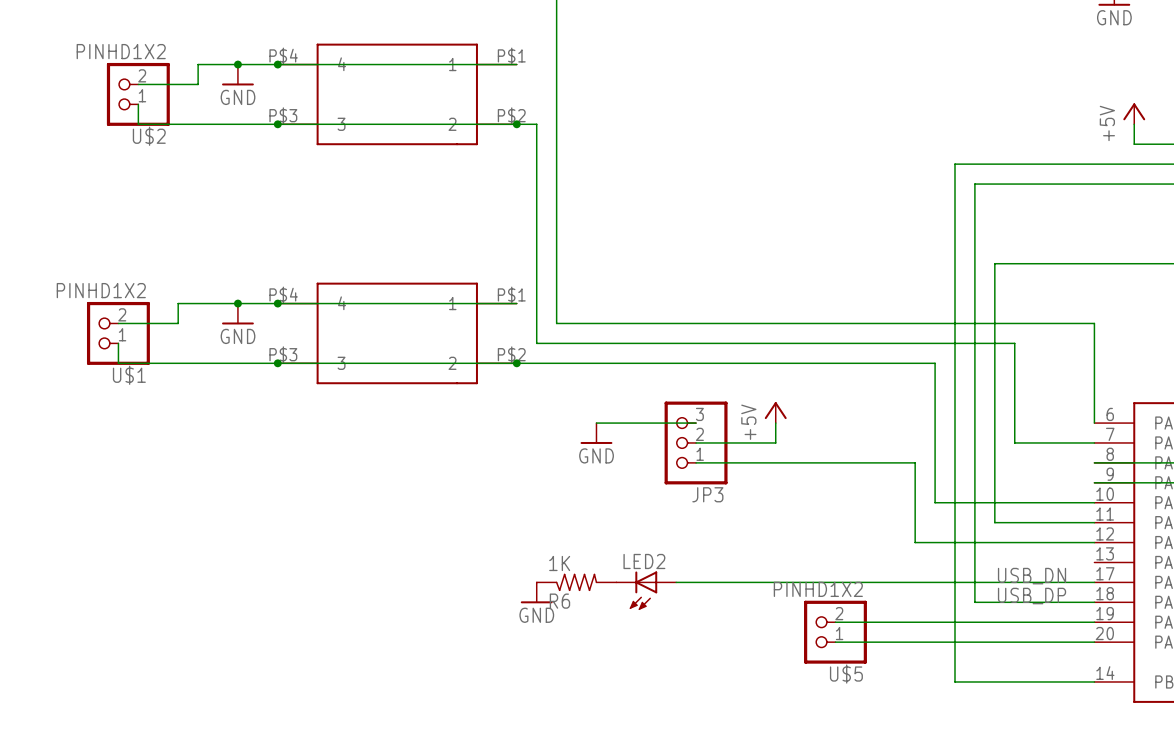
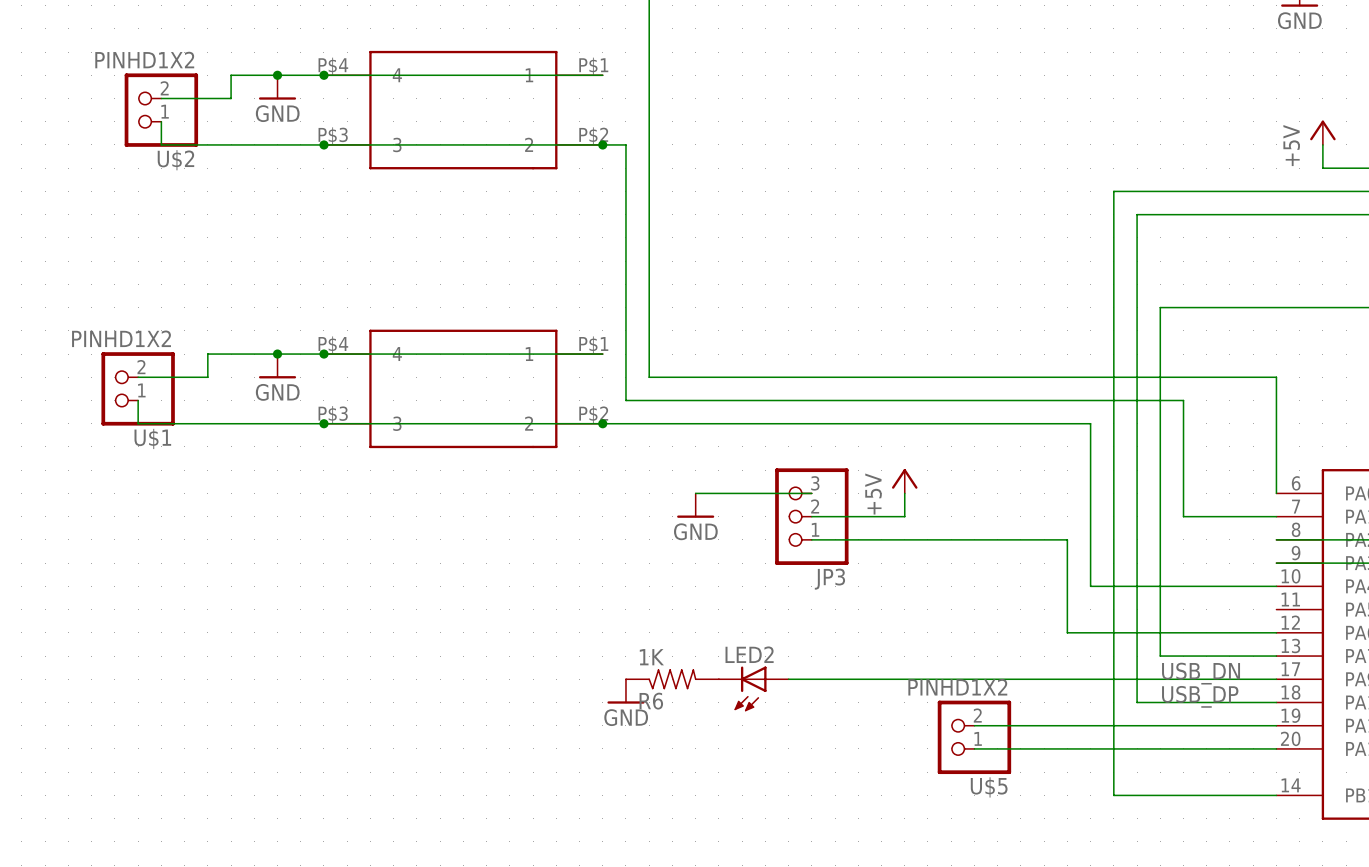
wire: (994, 522) (1094, 522) -> (1160, 609) (1160, 656) (1276, 656)

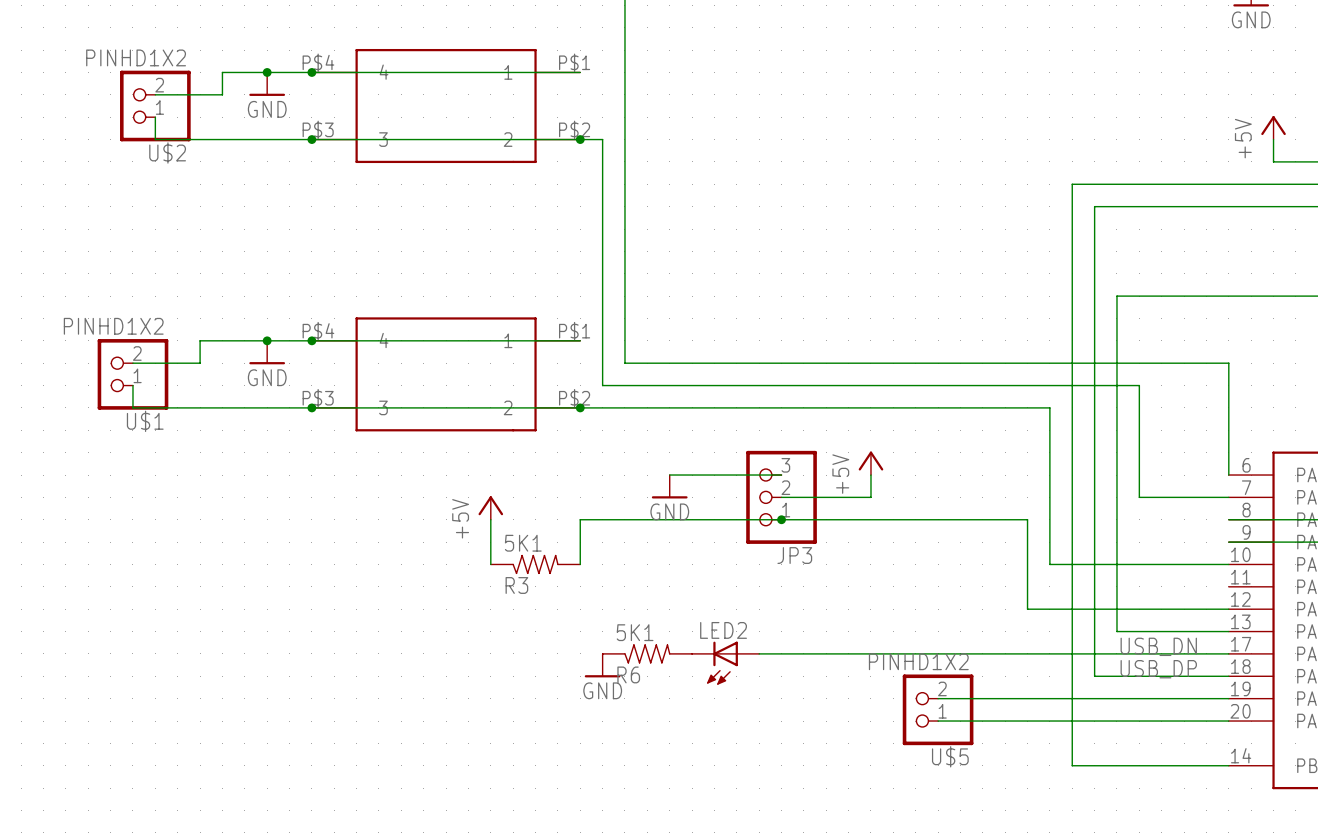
power symbol: none -> +5V (490, 507)
wire: none -> (490, 519) (490, 564)
wire: none -> (781, 519) (580, 519) (580, 564)
junction: none -> (781, 519)
R3: none -> 5K1 (535, 564)
R6 value: 1K (651, 657) -> 5K1 (635, 632)

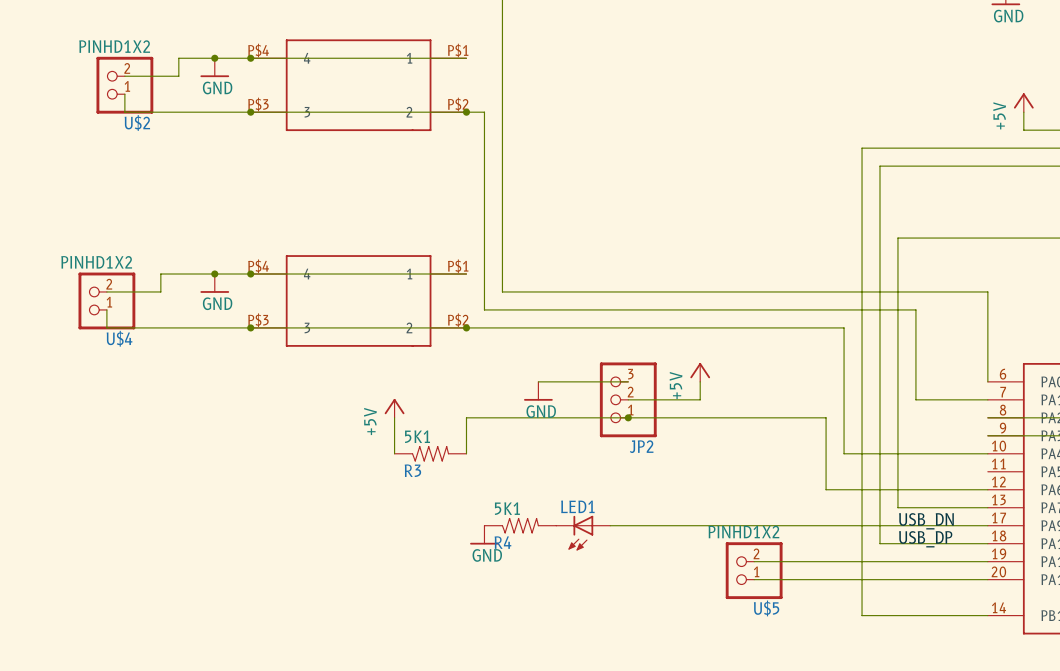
U$1 name: U$1 (145, 421) -> U$4 (119, 338)
JP3 name: JP3 (794, 555) -> JP2 (641, 446)
LED2 name: LED2 (723, 630) -> LED1 (577, 506)
R6 name: R6 (628, 674) -> R4 (502, 542)

